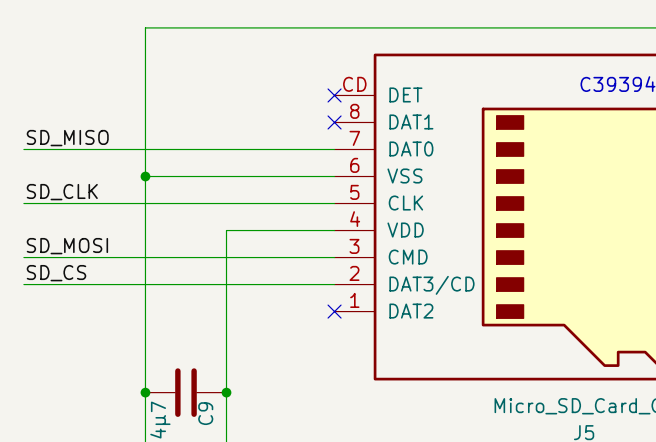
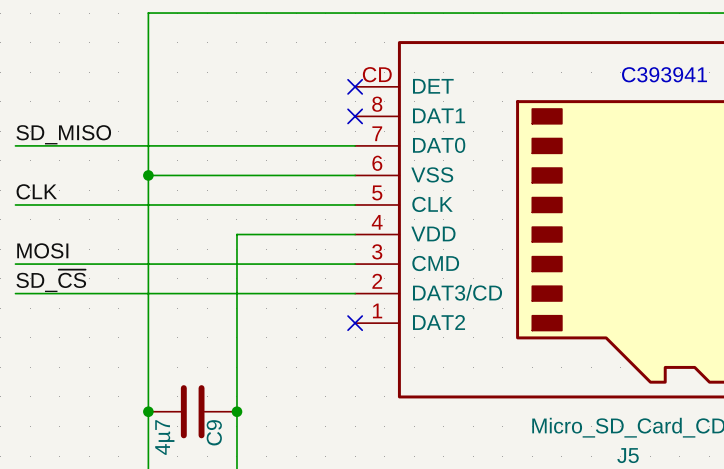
label: SD_CLK (62, 192) -> CLK (36, 191)
label: SD_MOSI (67, 246) -> MOSI (42, 250)
label: SD_CS (56, 273) -> SD_~{CS} (51, 280)

